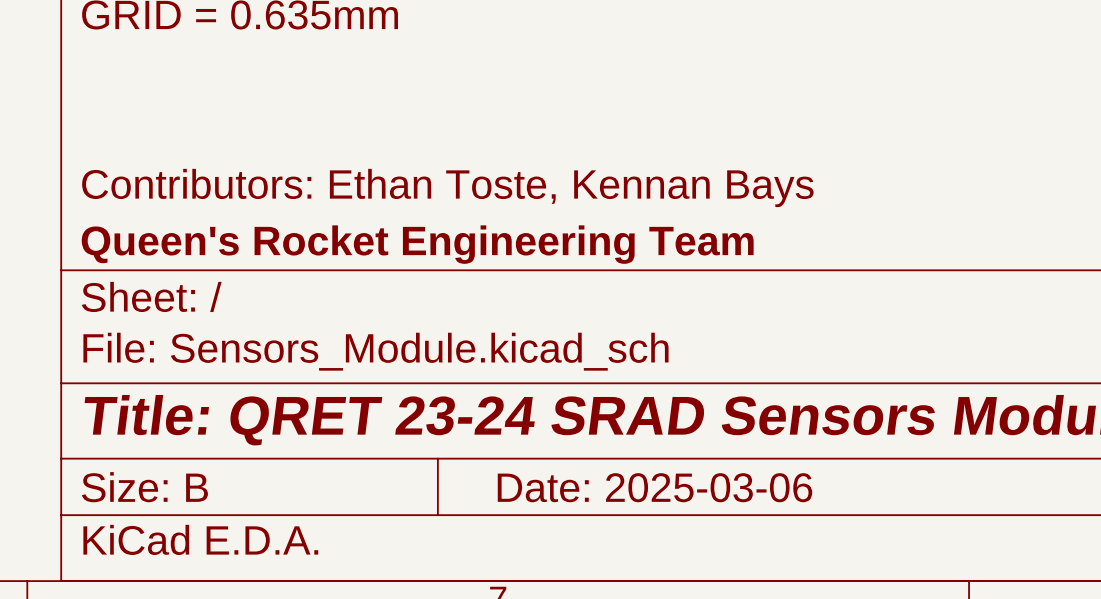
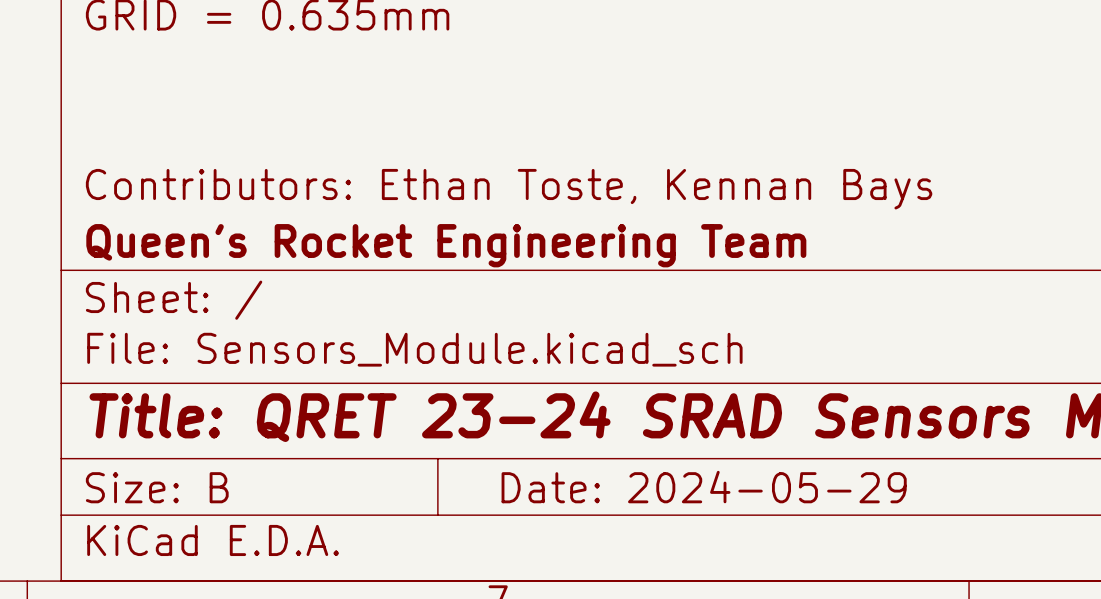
title block: Date: 2025-03-06 (654, 487) -> Date: 2024-05-29 (704, 487)

